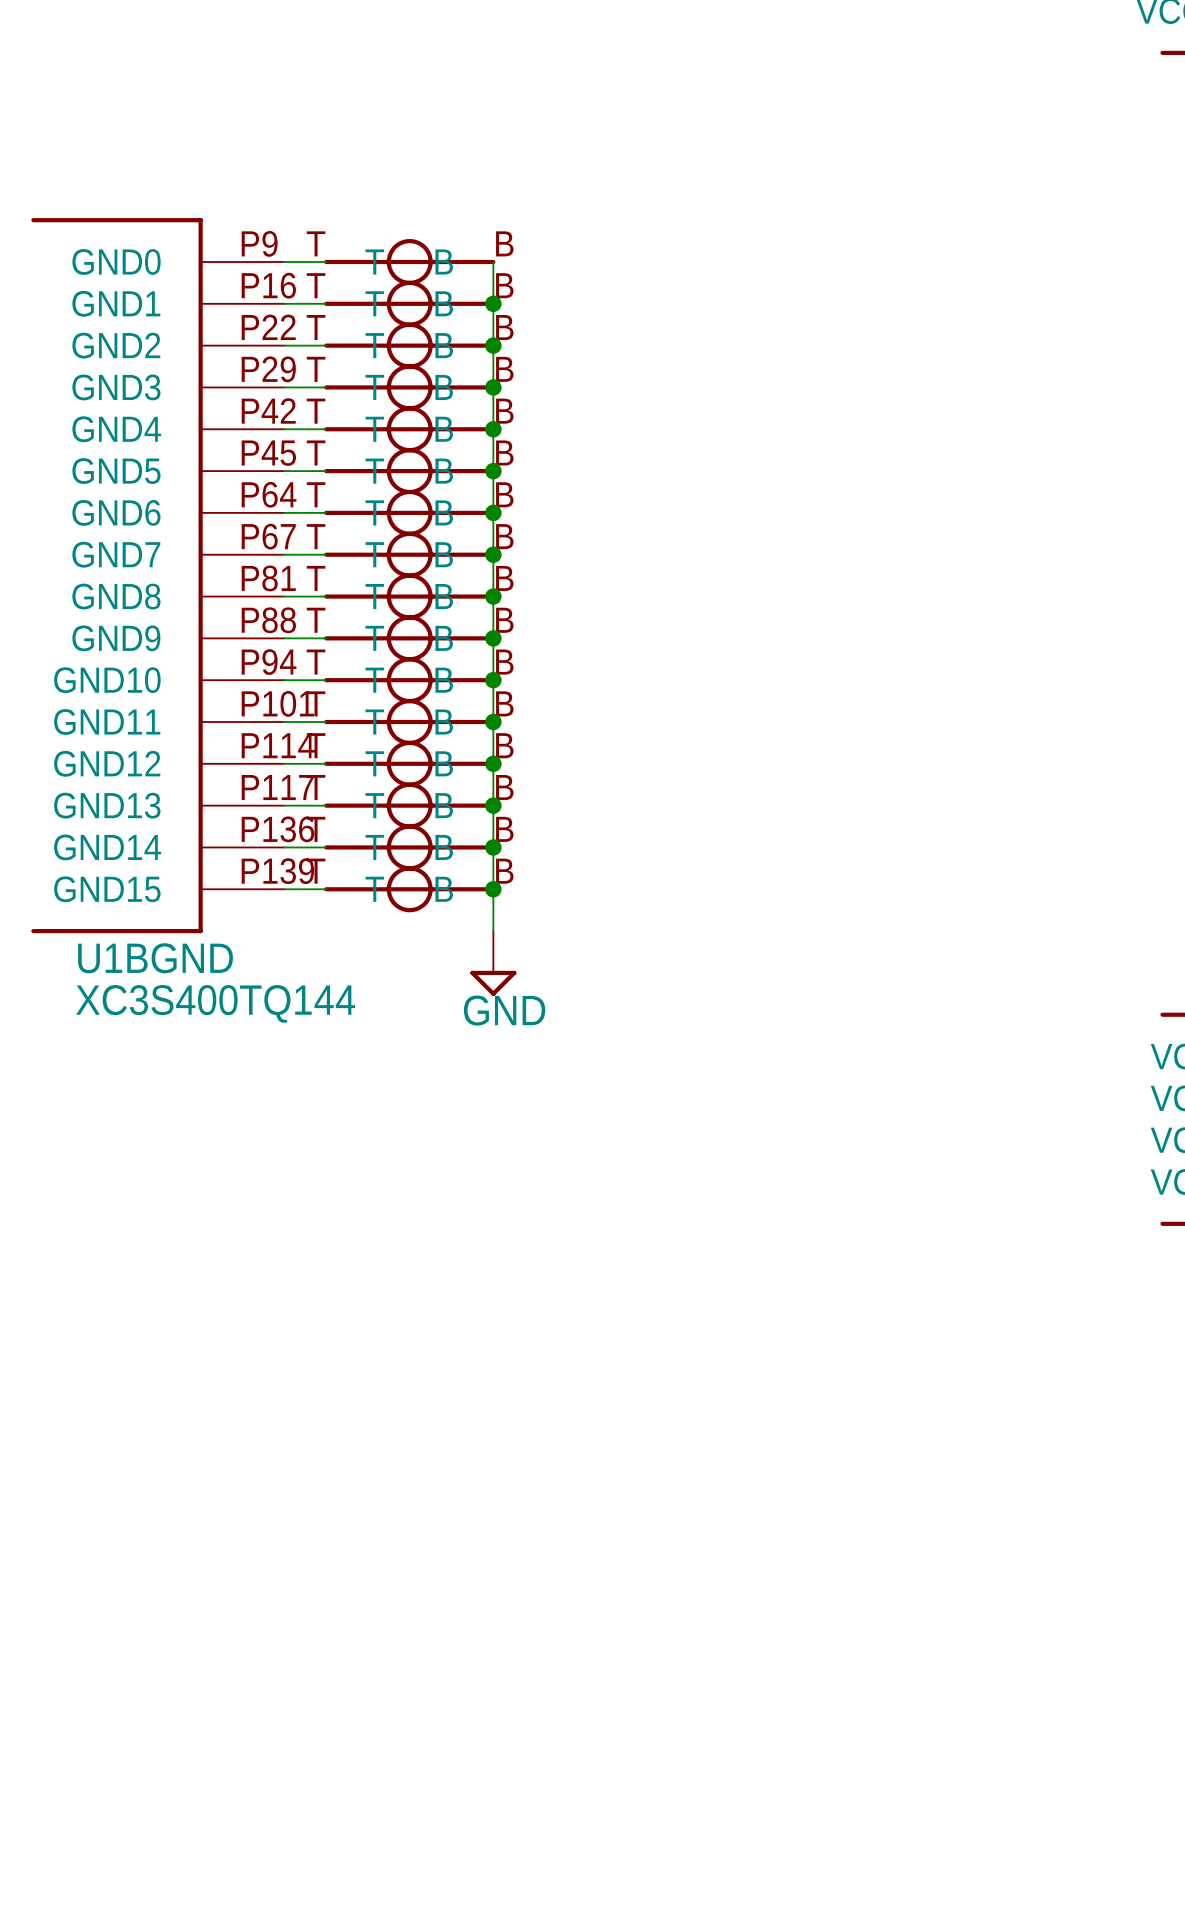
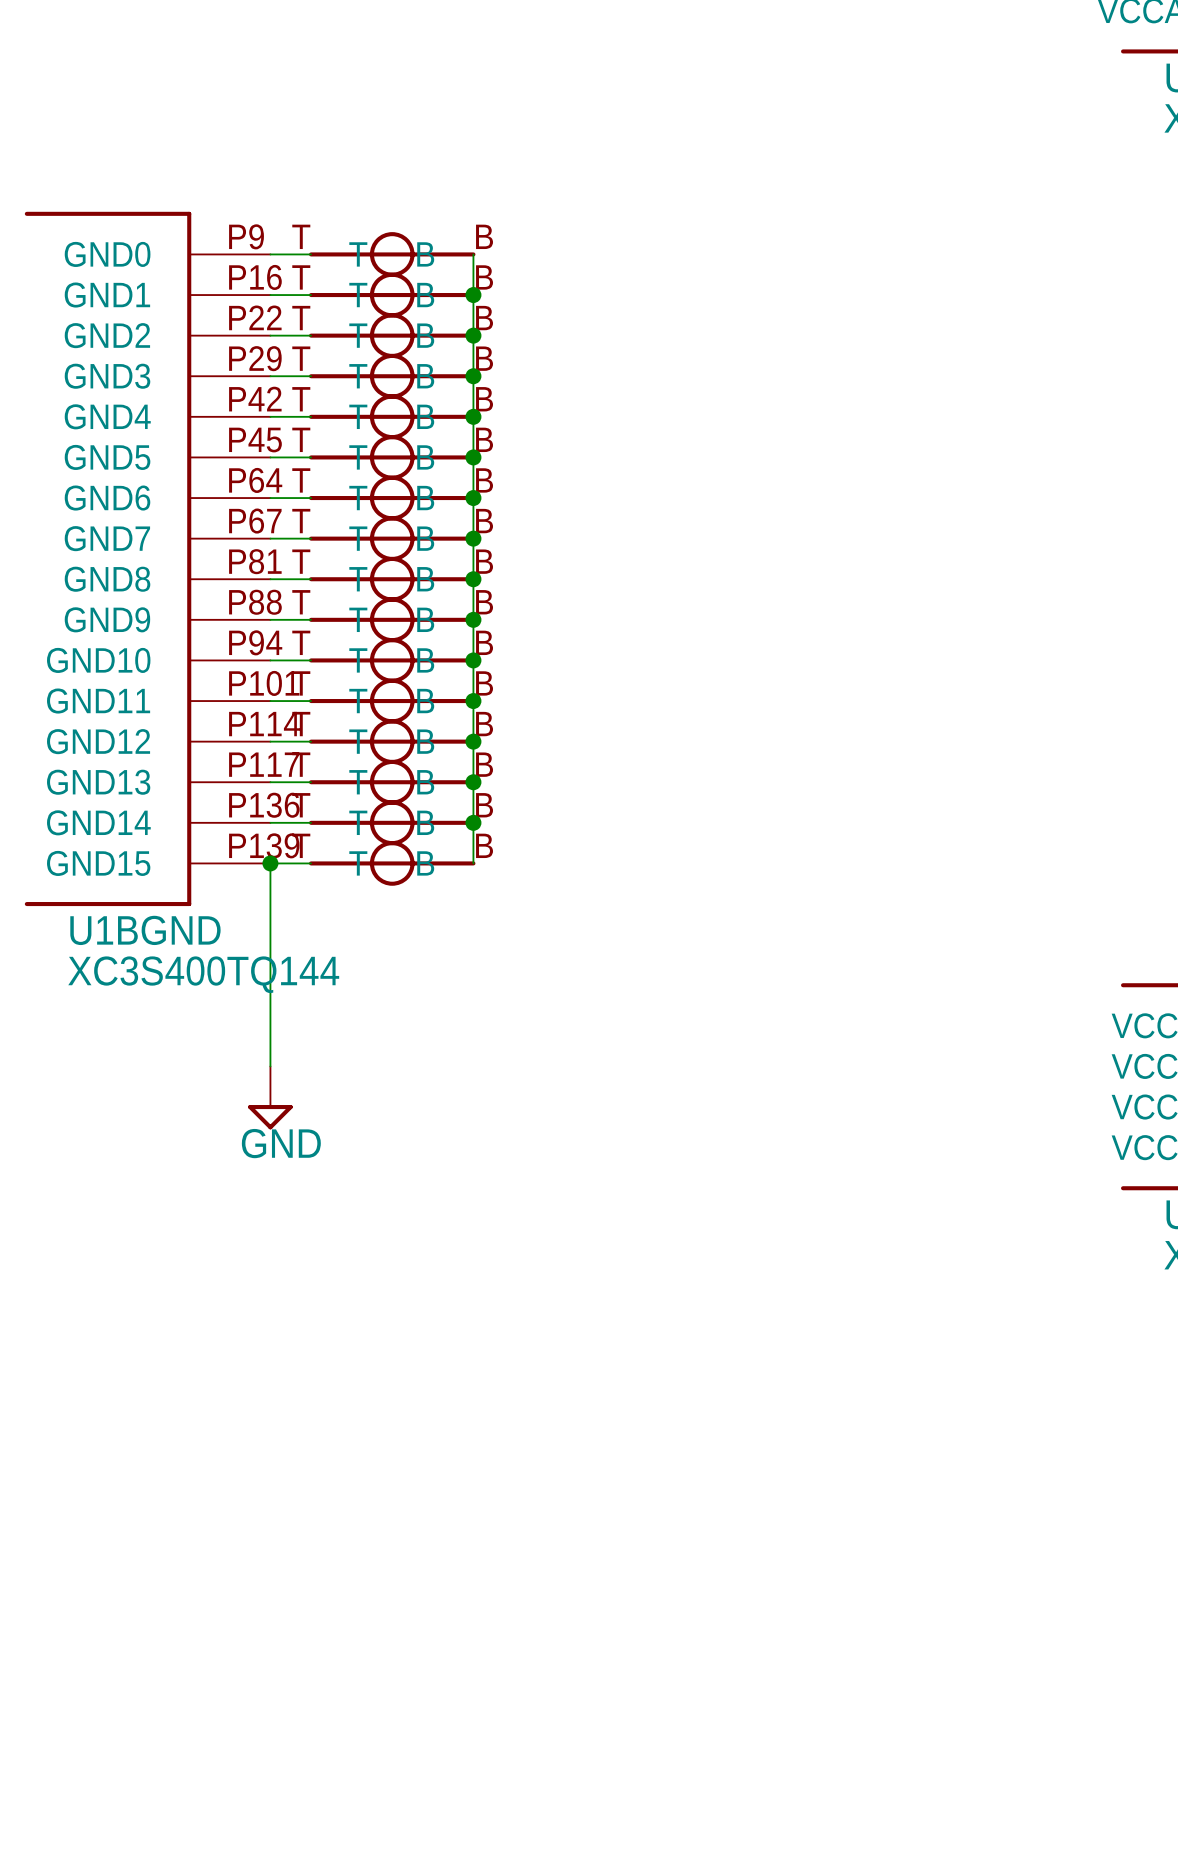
wire: none -> (270, 863) (270, 1066)
junction: none -> (270, 863)
wire: (493, 889) (493, 931) -> none
junction: (493, 889) -> none
power symbol position: GND (493, 963) -> GND (270, 1097)

